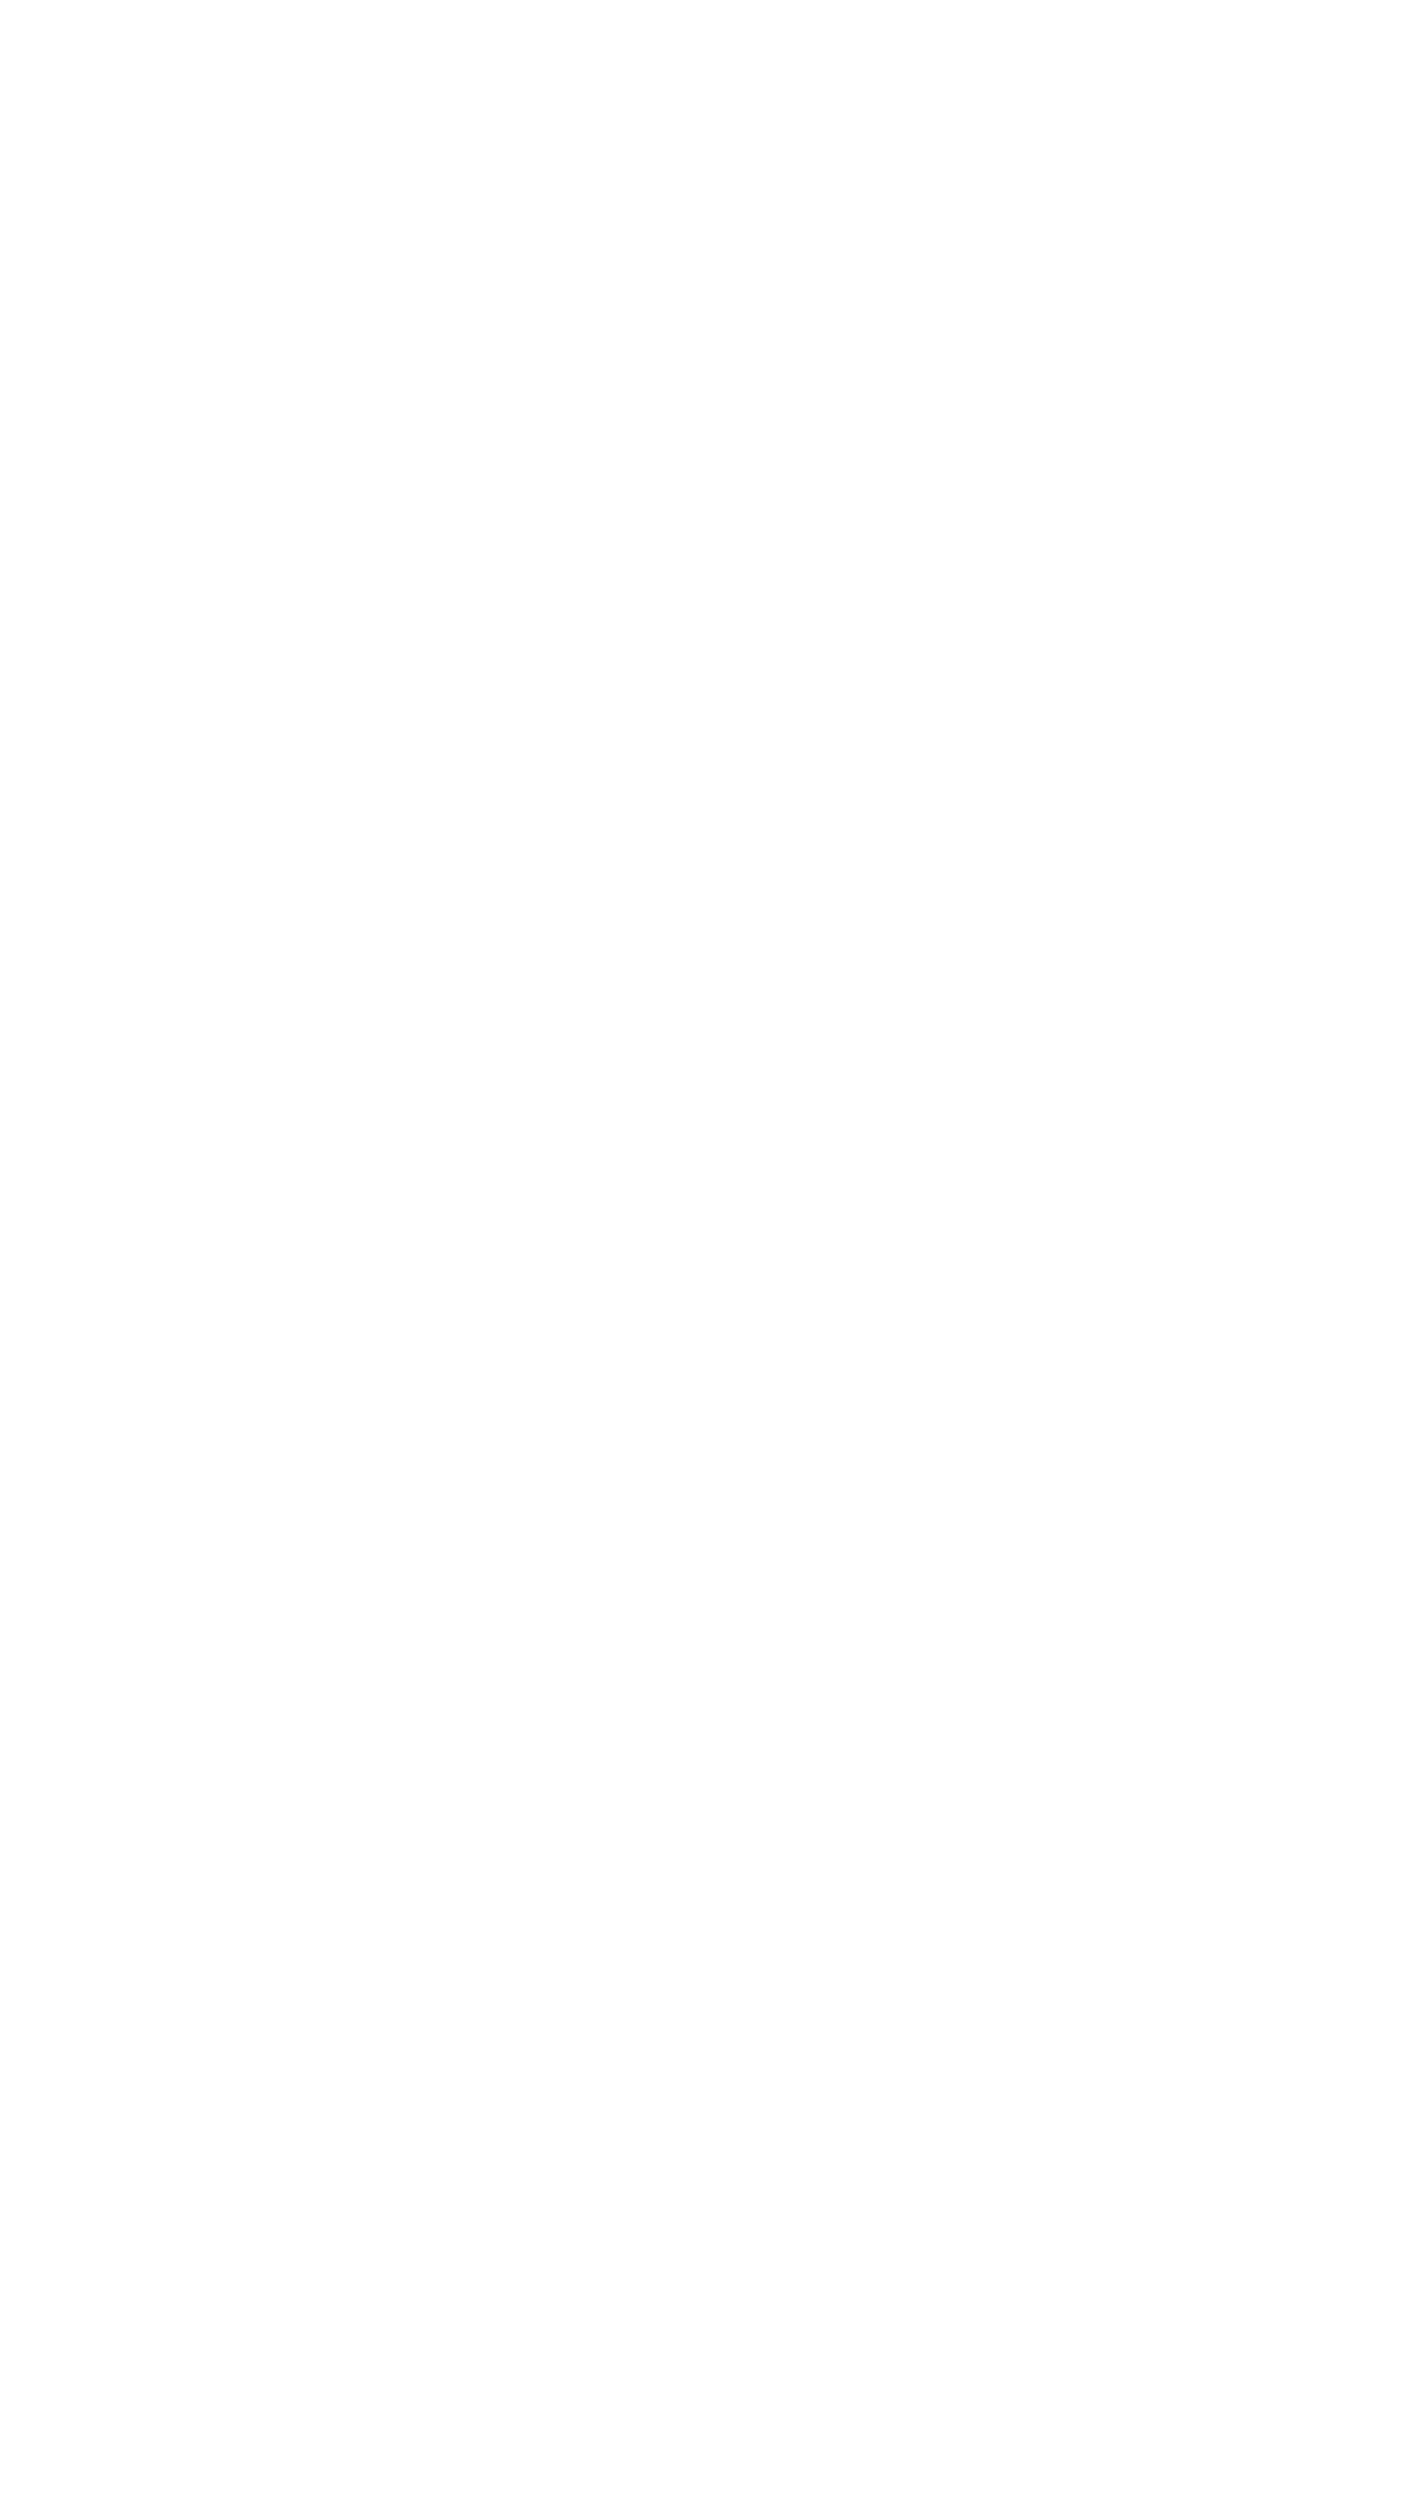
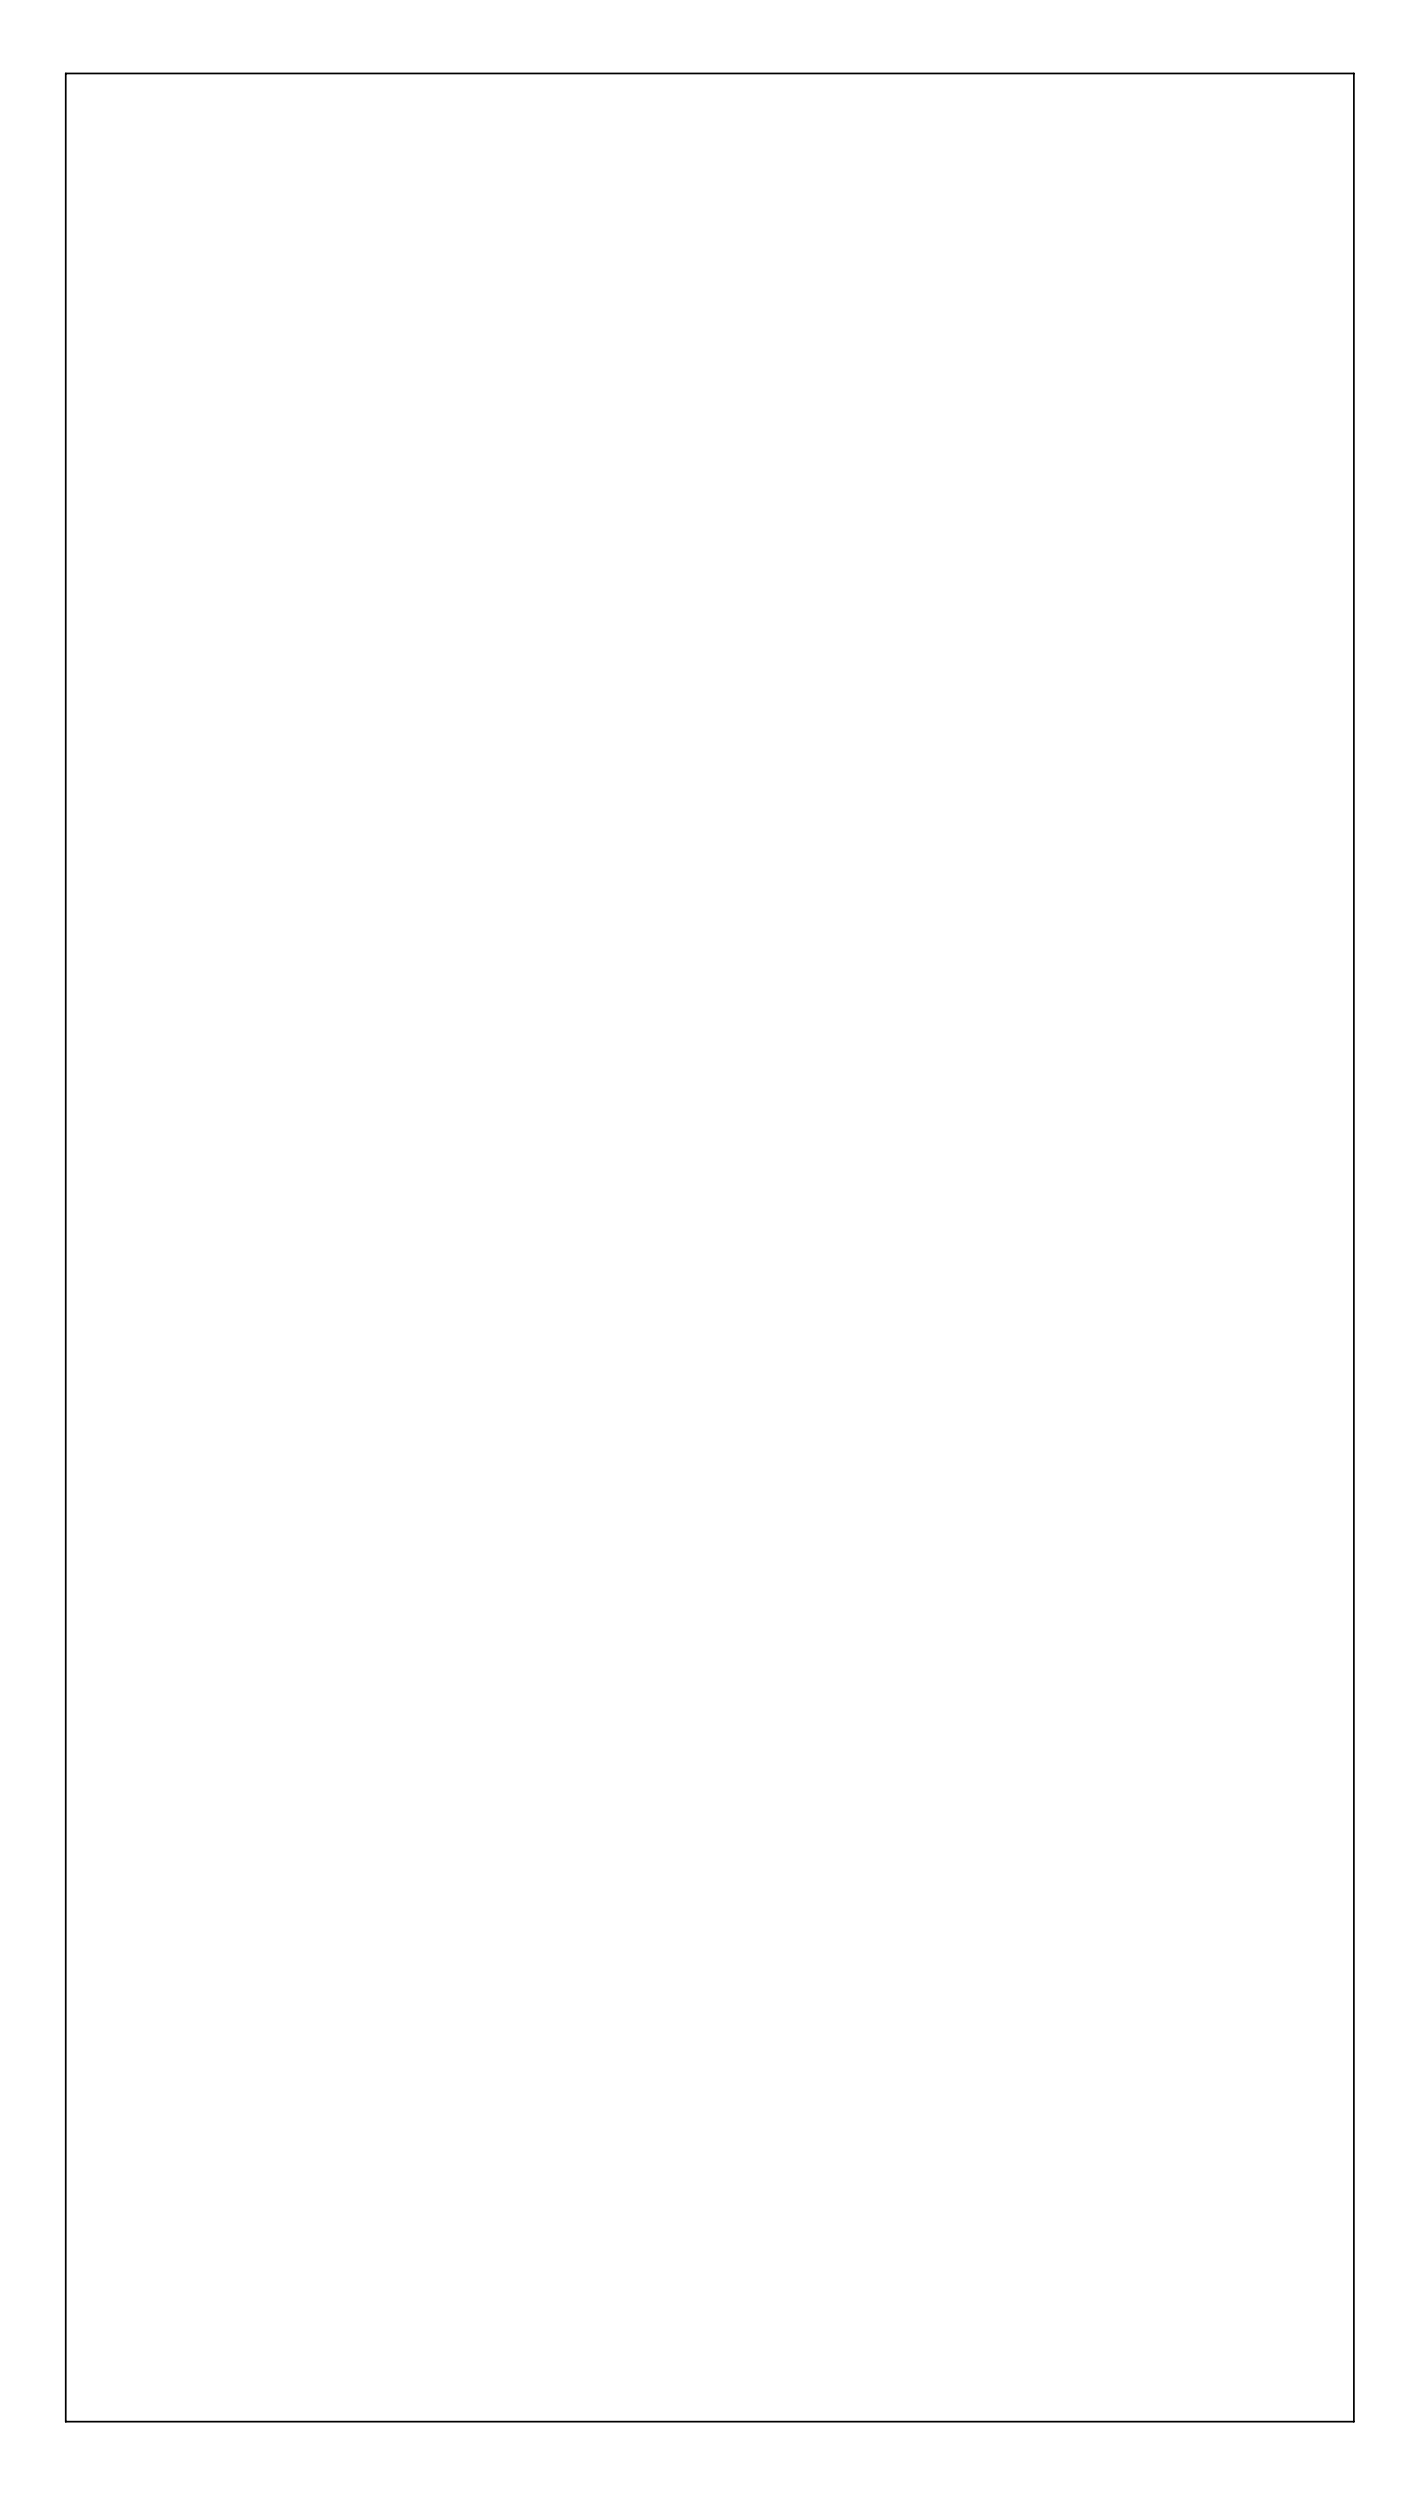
board edge: none -> (65, 73) (1353, 73) (1353, 2421) (65, 2421) (65, 73)

